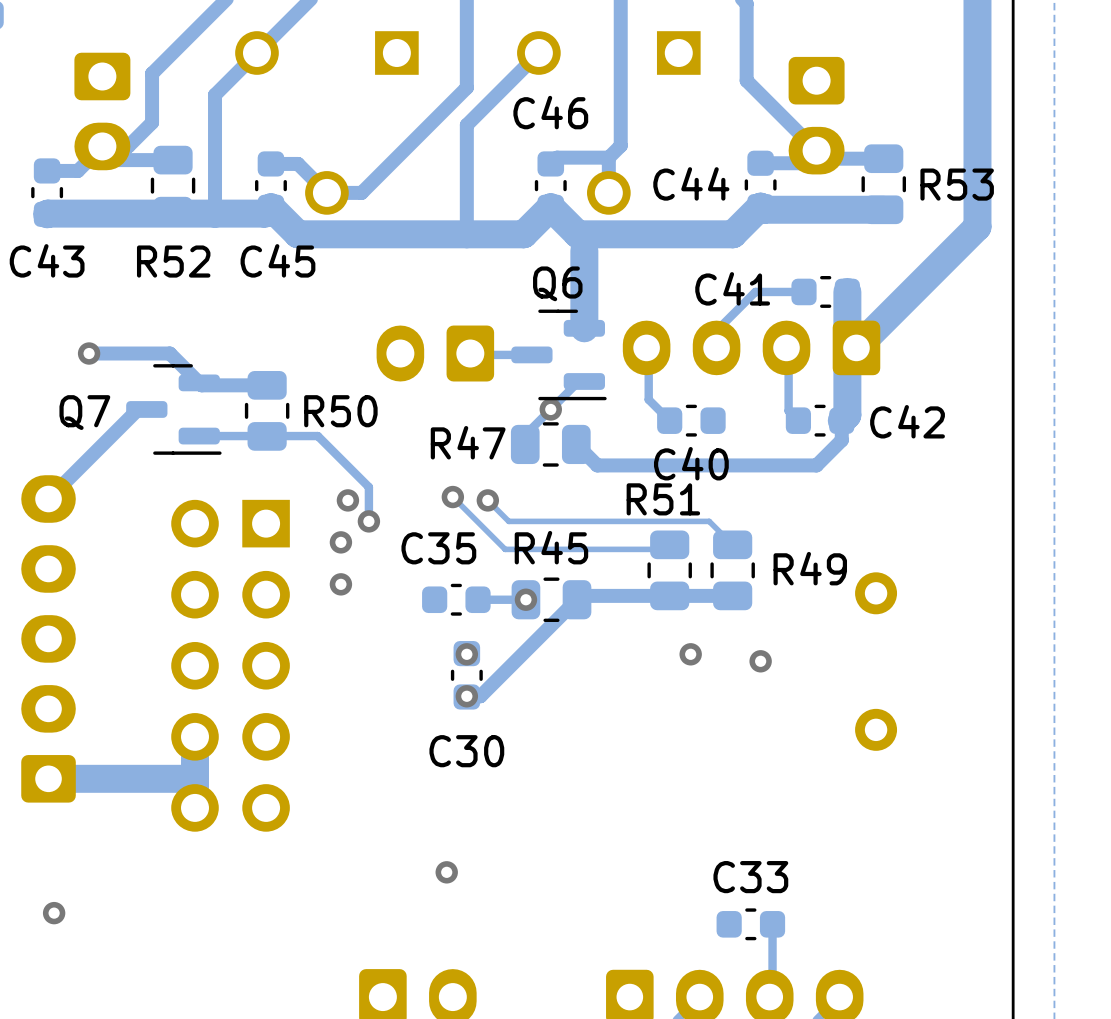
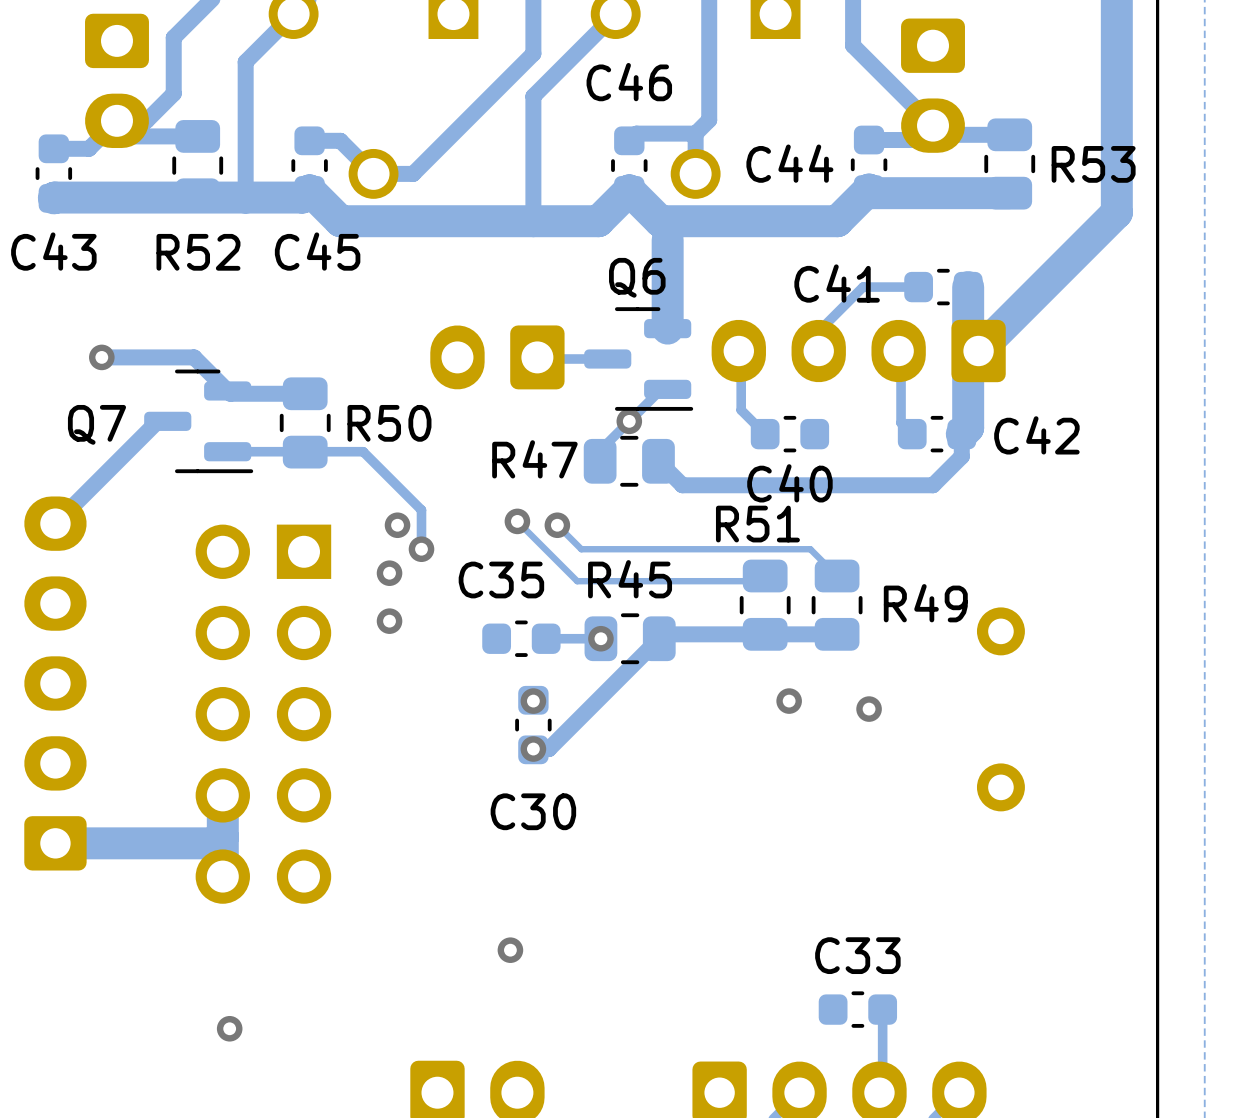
via: (54, 913) -> none
via: none -> (229, 1028)

